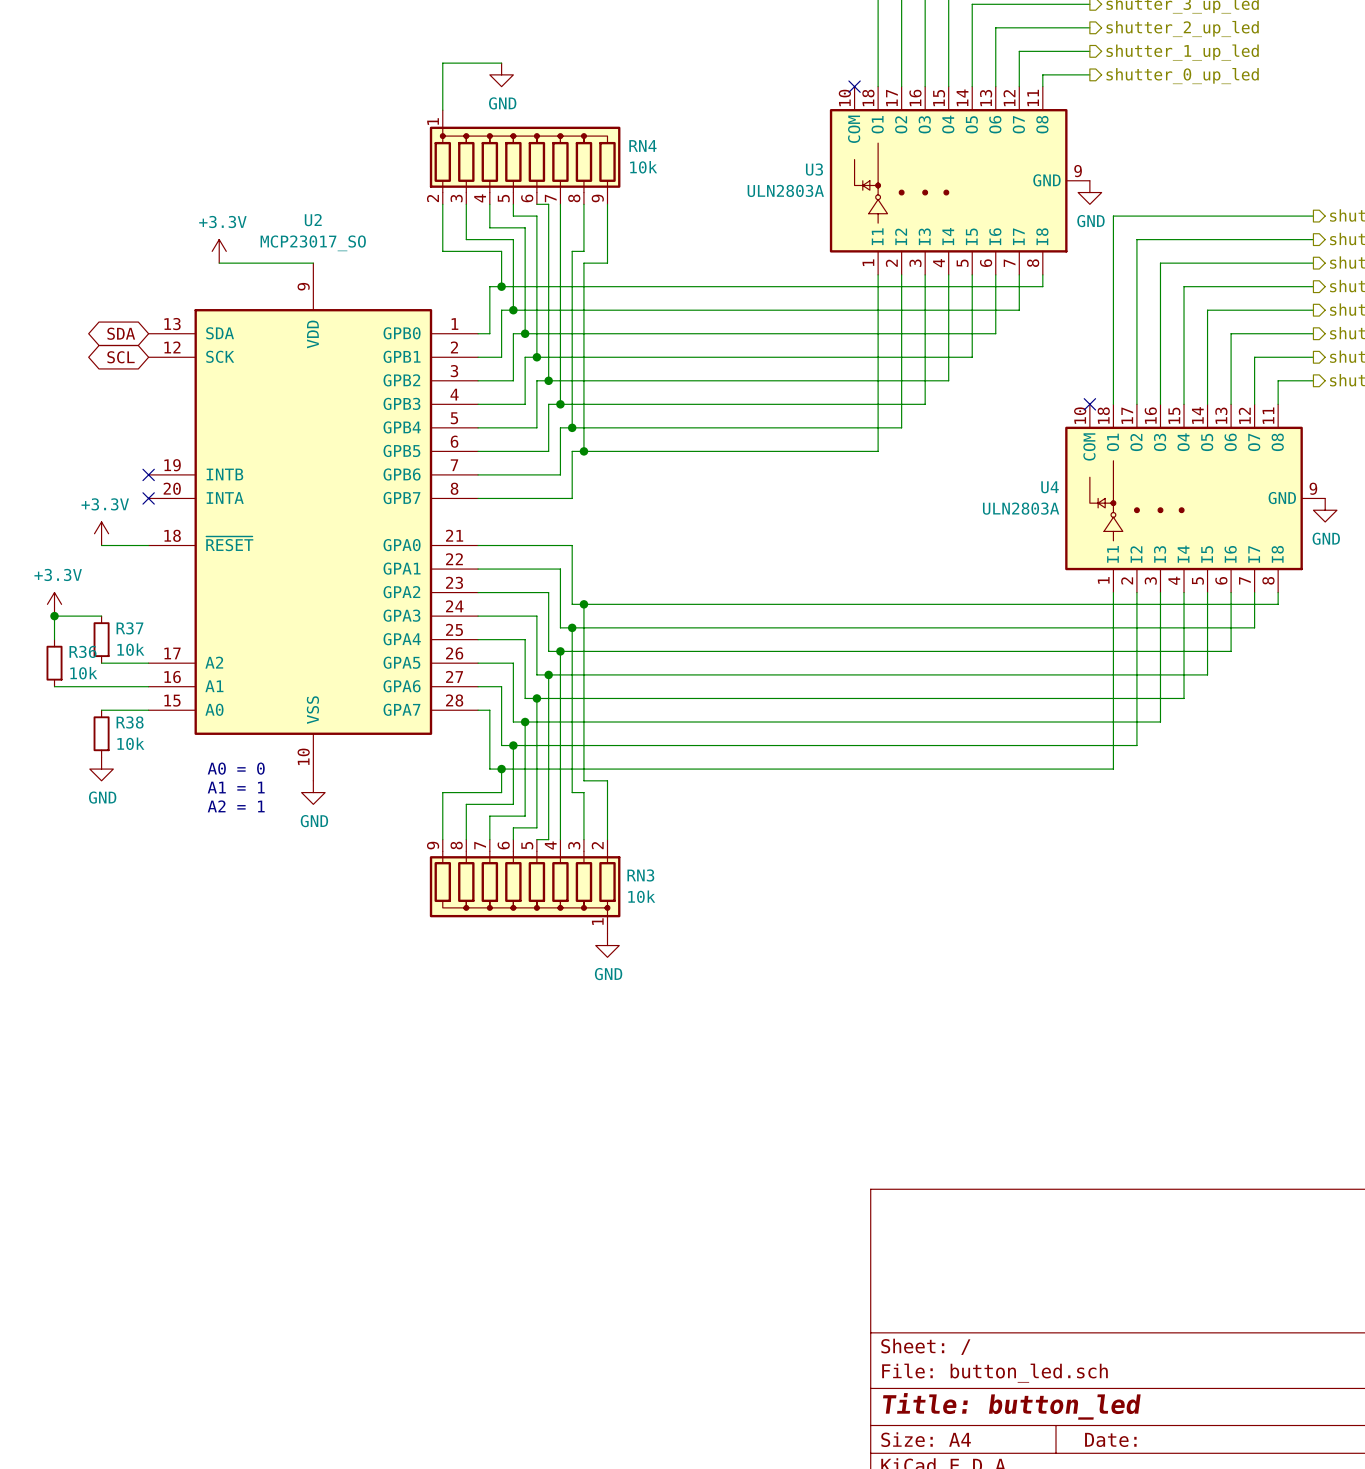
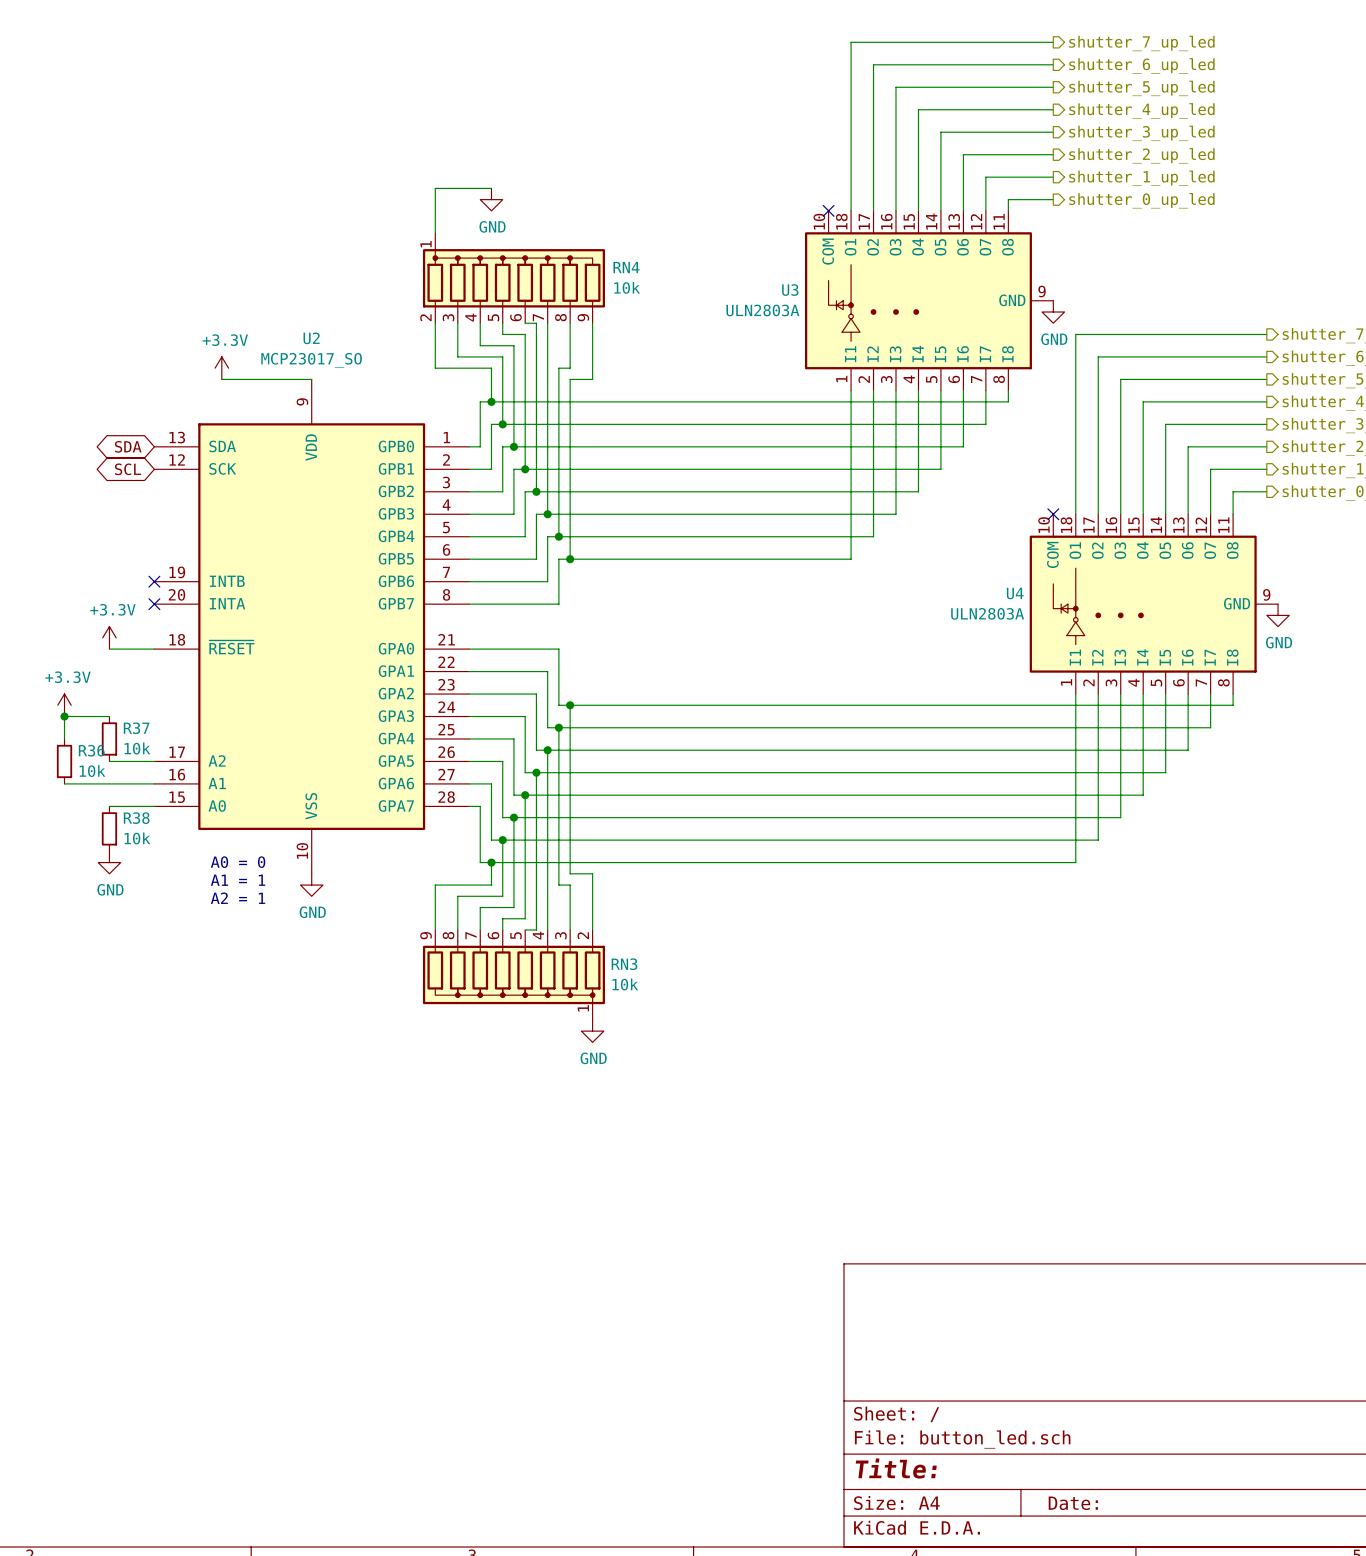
title block: Title: button_led (1011, 1406) -> Title: (896, 1468)

